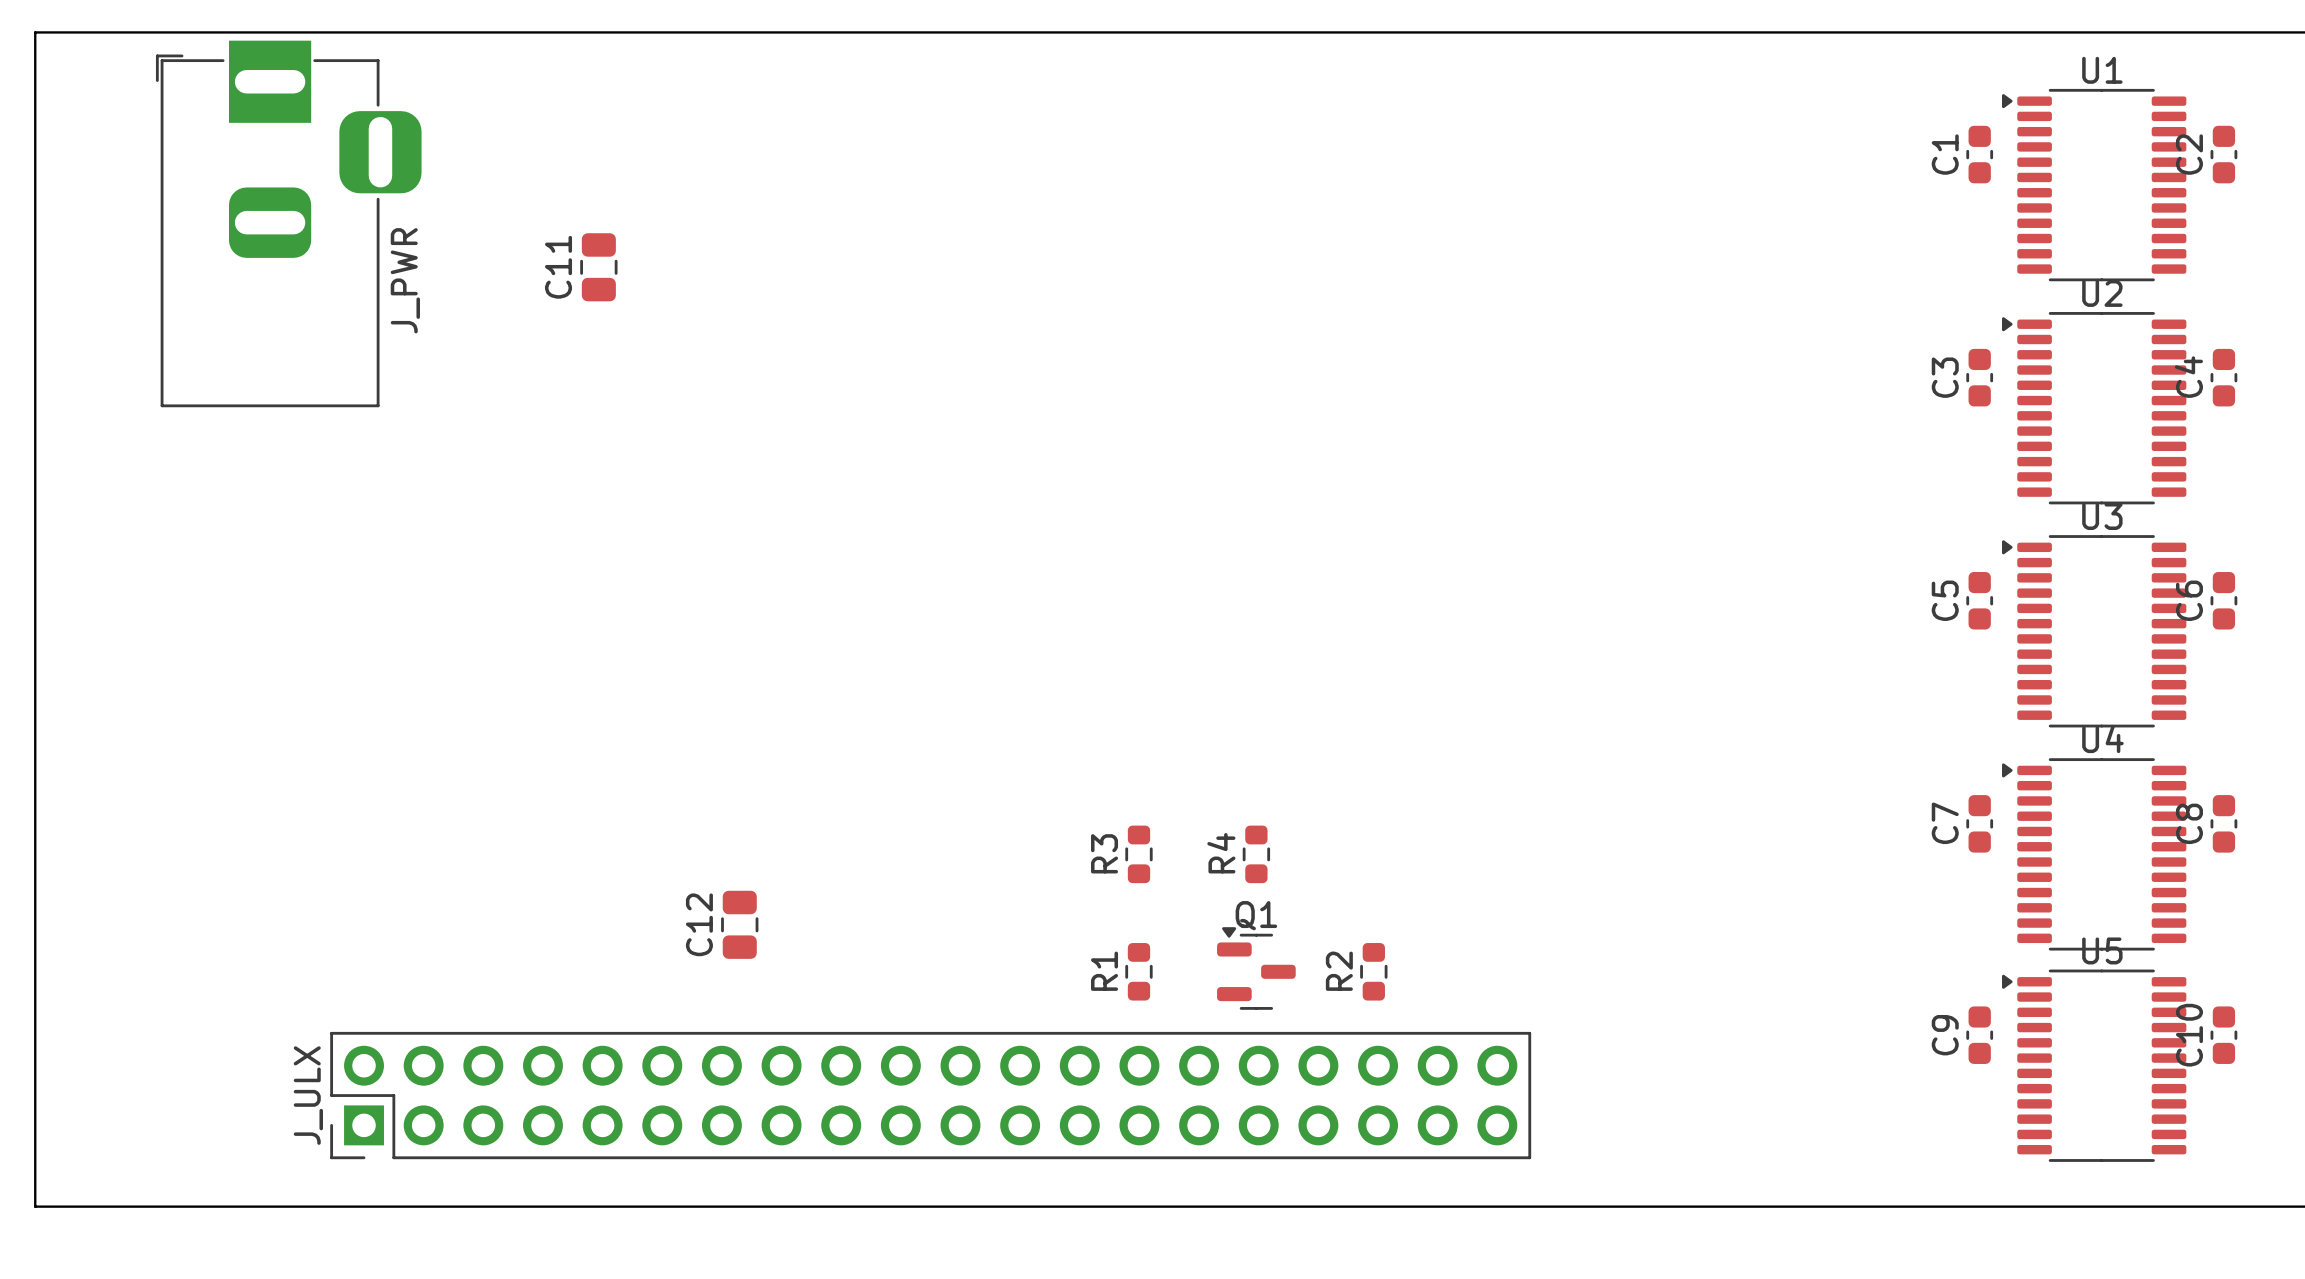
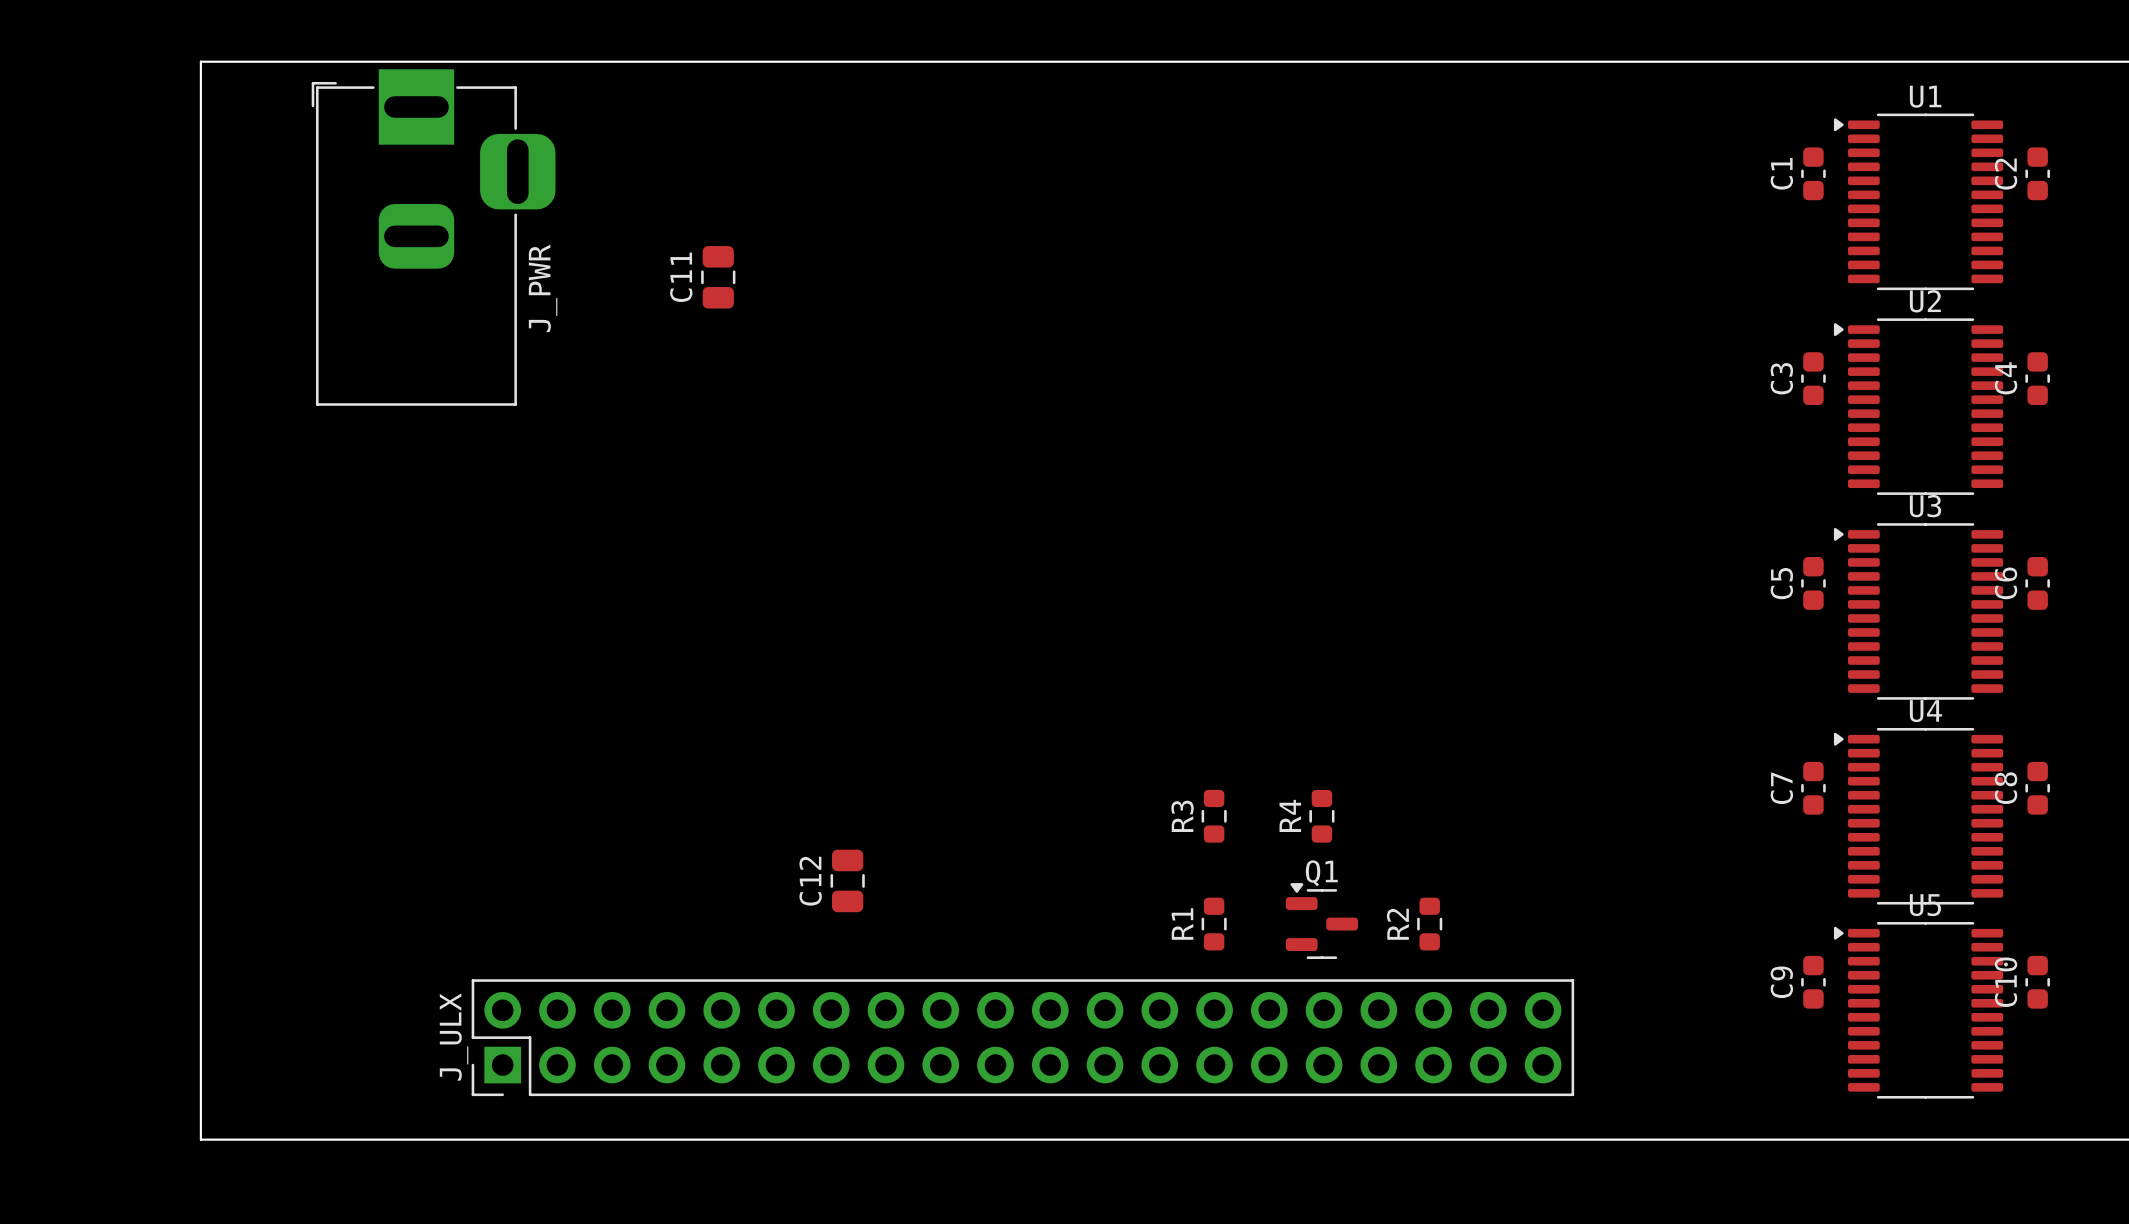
board edge: (223, 32) (35, 32) (35, 1206) (223, 1206) -> (200, 61) (200, 1139)
J_PWR position: (288, 223) -> (433, 237)
C11 position: (598, 267) -> (718, 277)
R3 position: (1138, 854) -> (1214, 816)
R4 position: (1256, 854) -> (1321, 816)
C12 position: (739, 924) -> (847, 880)
Q1 position: (1256, 968) -> (1321, 921)
R1 position: (1138, 971) -> (1214, 924)
R2 position: (1373, 971) -> (1429, 924)
J_ULX position: (930, 1095) -> (1022, 1037)

